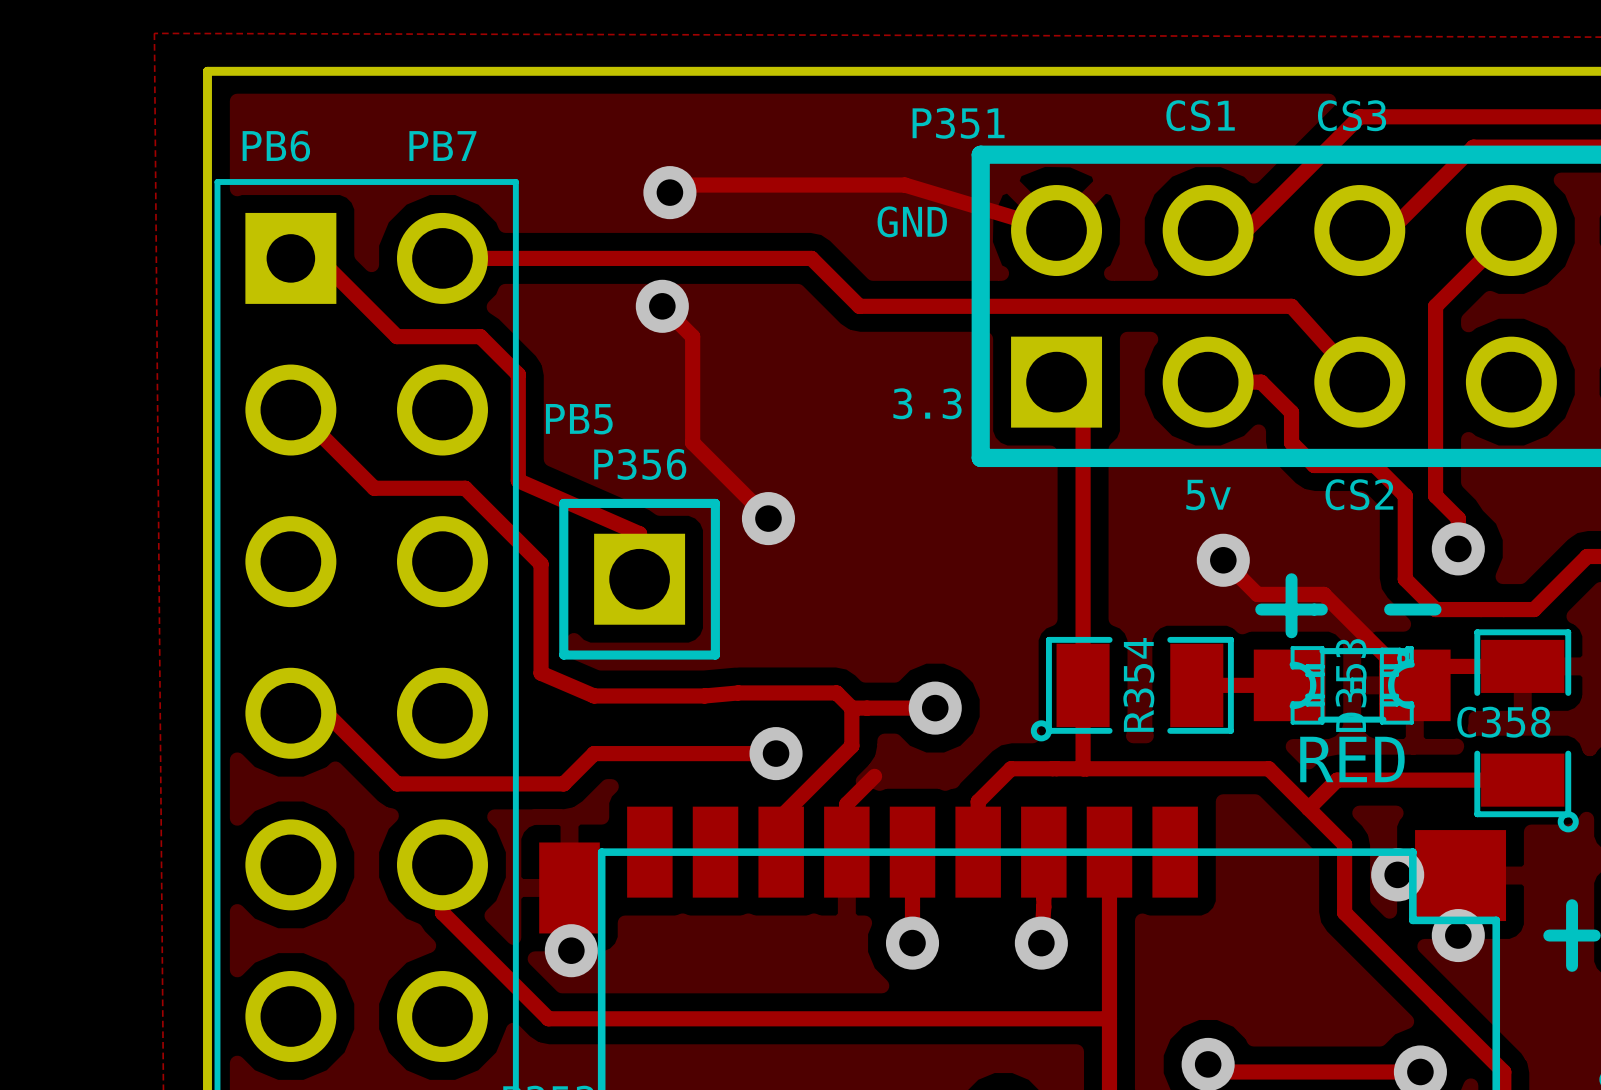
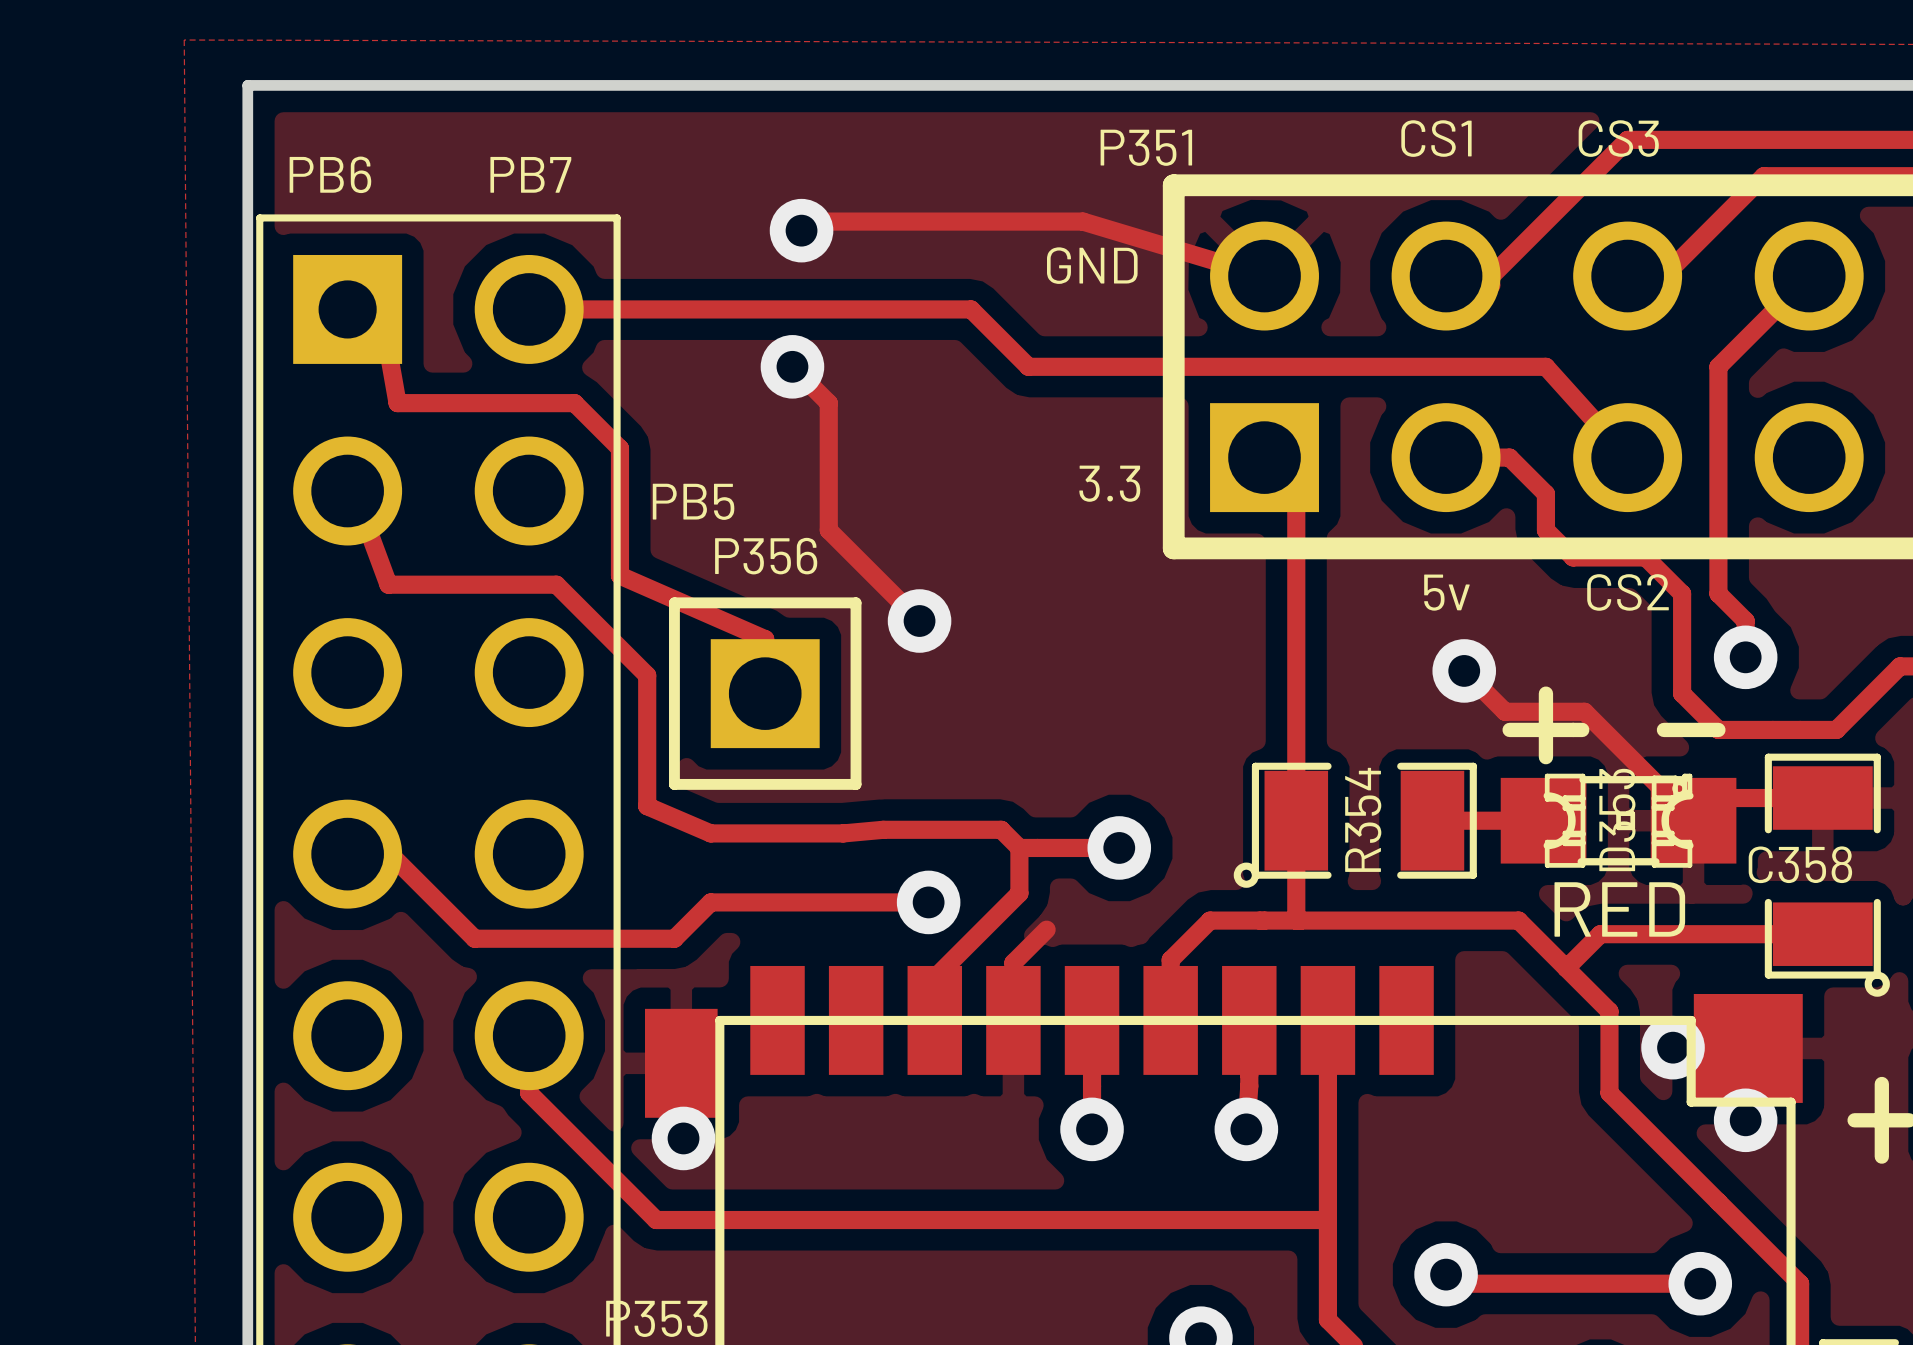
track: (318, 258) (397, 336) -> (381, 309) (397, 403) (474, 403)
track: (290, 410) (296, 410) (374, 488) -> (353, 491) (388, 584) (447, 584)

